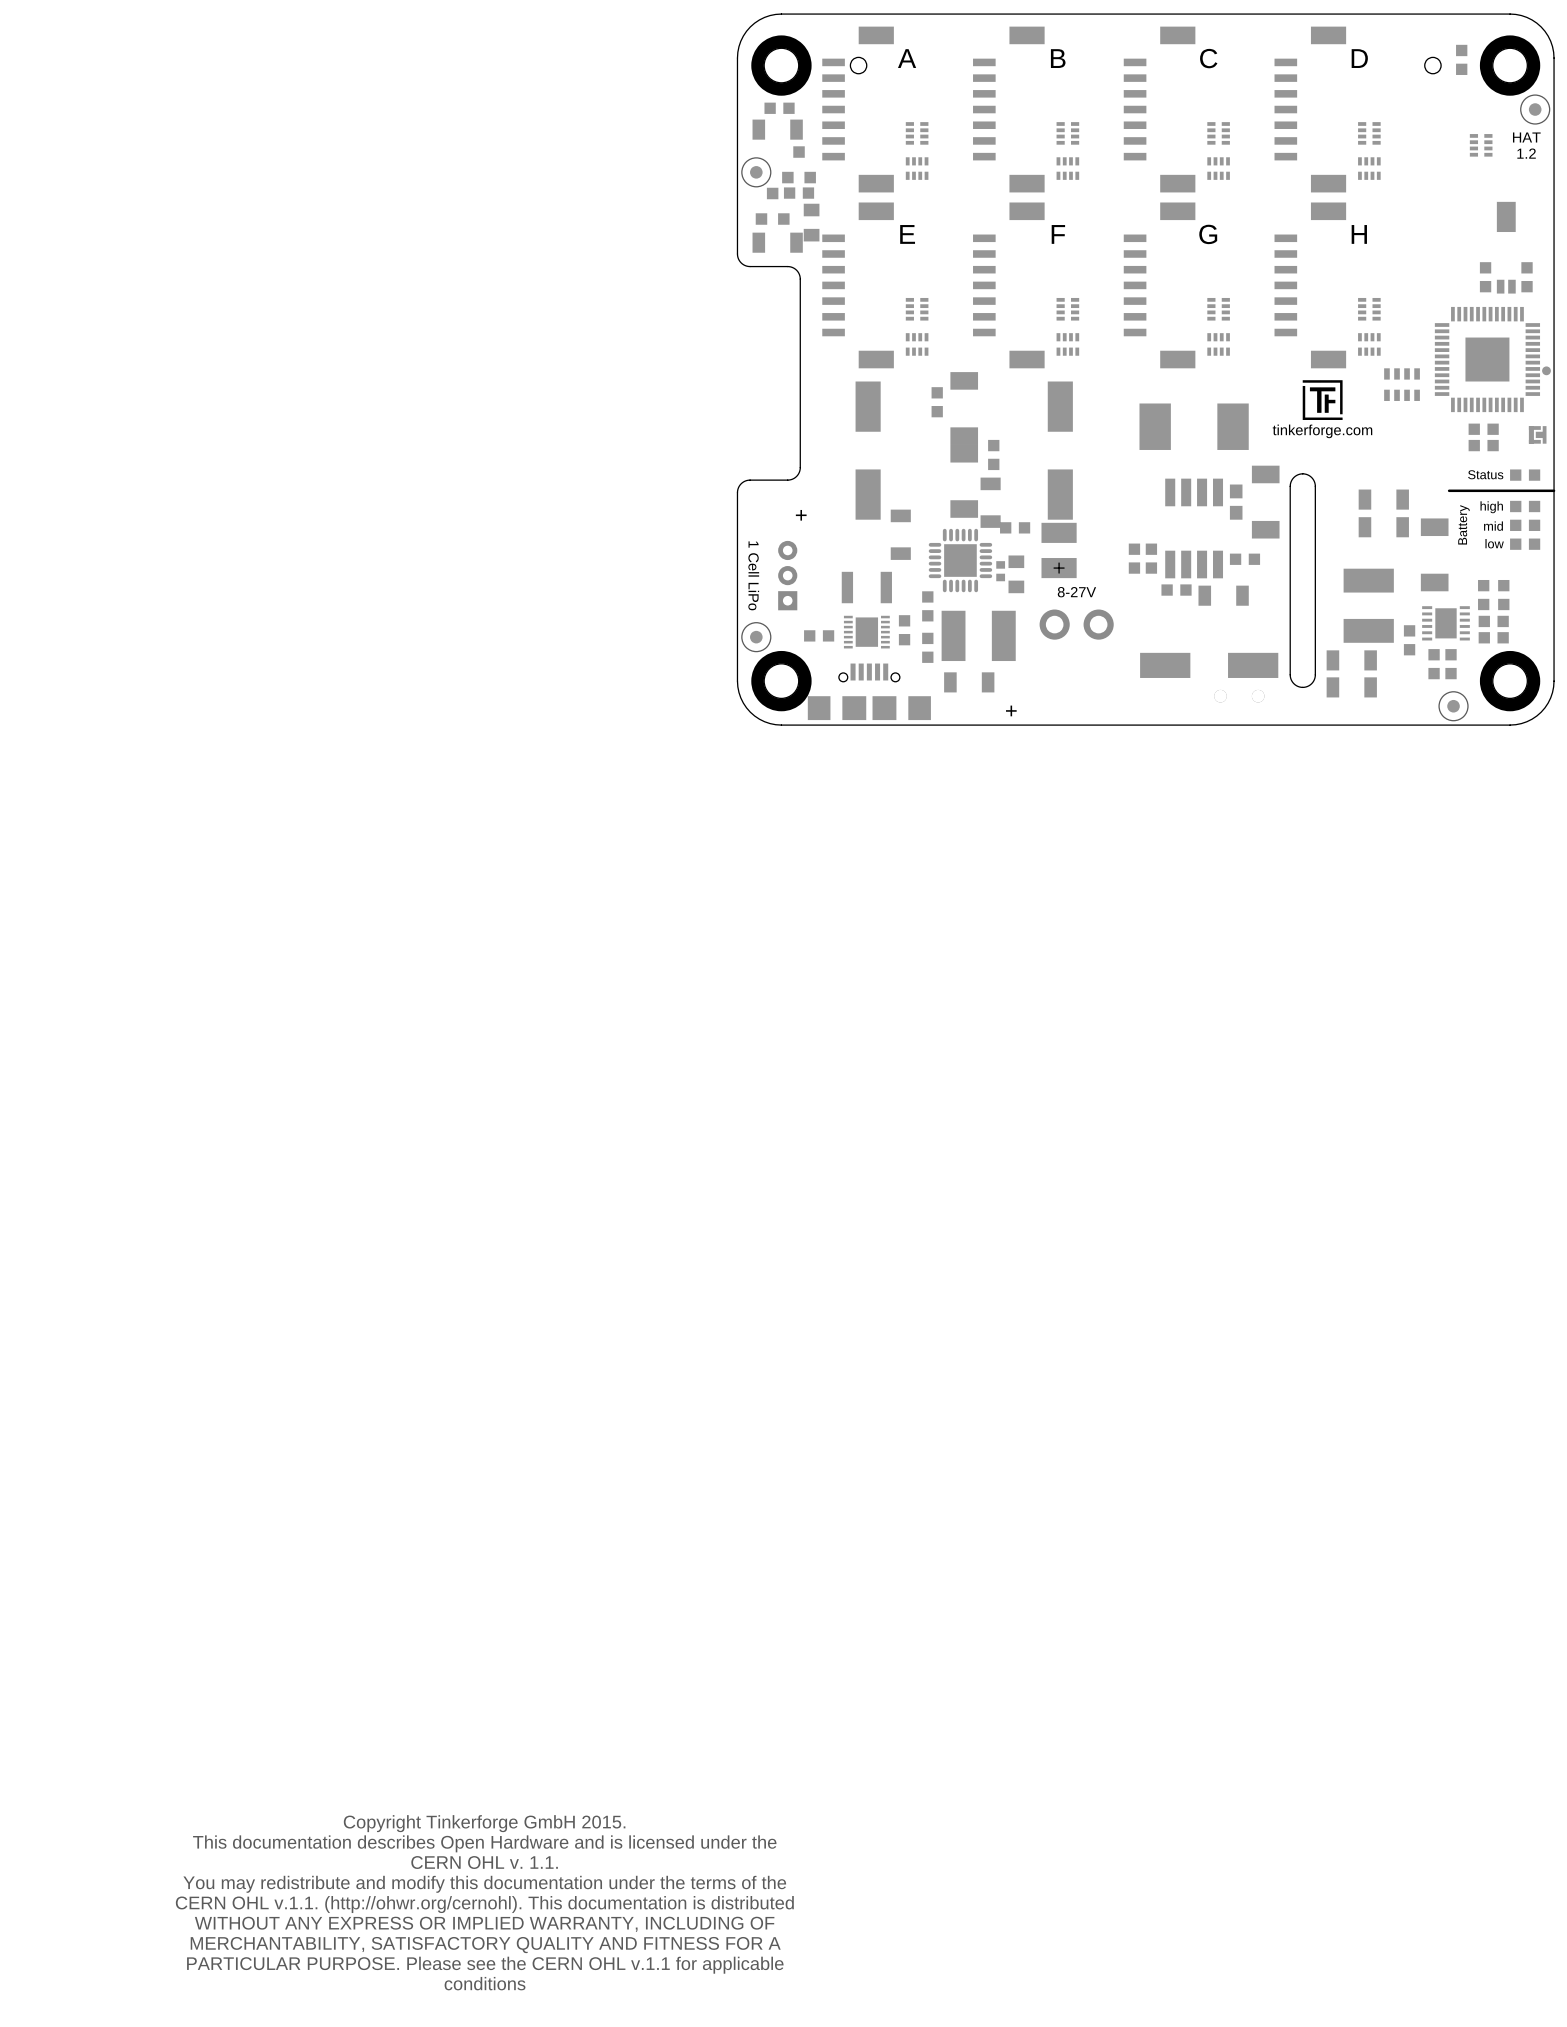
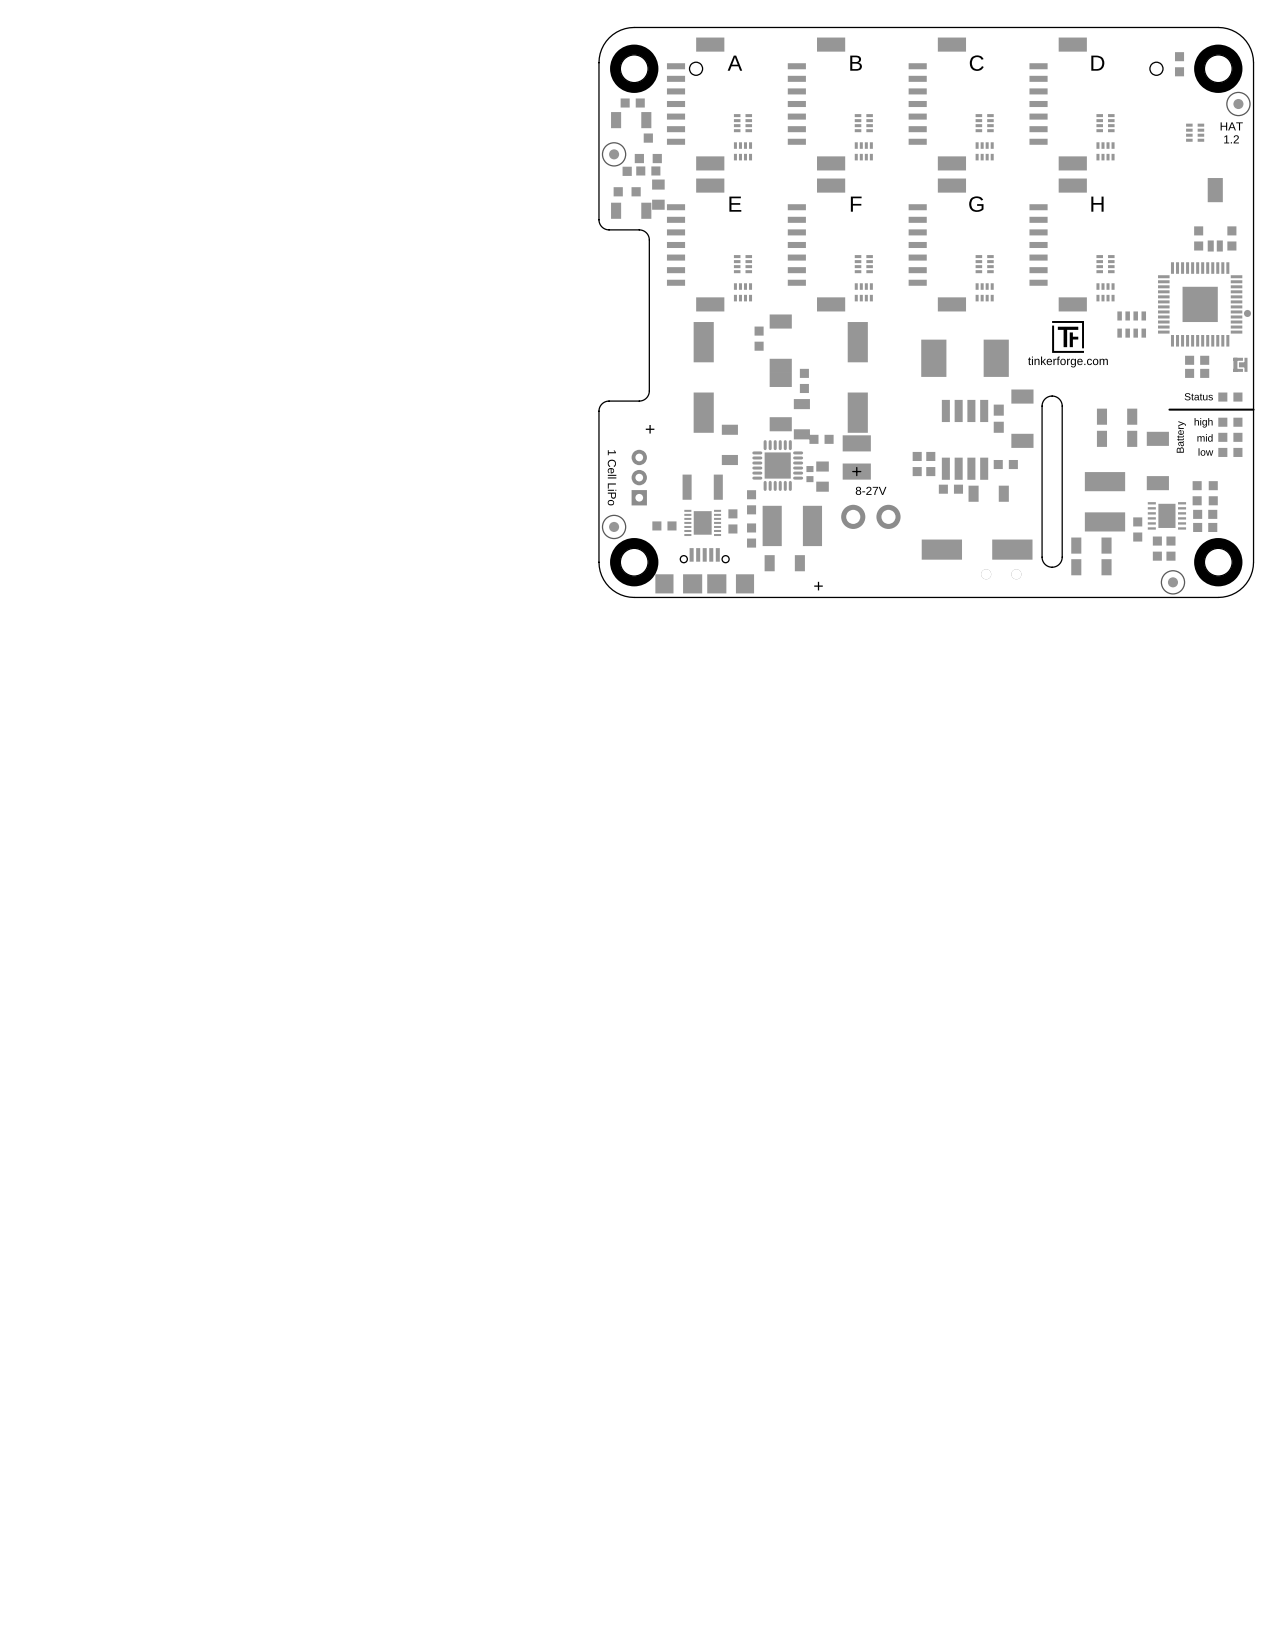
text: Copyright Tinkerforge GmbH 2015. (484, 1823) -> none
text: This documentation describes Open Hardware and is licensed under the (484, 1843) -> none
text: CERN OHL v. 1.1. (484, 1862) -> none
text: You may redistribute and modify this documentation under the terms of the (484, 1884) -> none
text: CERN OHL v.1.1. (http://ohwr.org/cernohl). This documentation is distributed (484, 1904) -> none
text: WITHOUT ANY EXPRESS OR IMPLIED WARRANTY, INCLUDING OF (484, 1924) -> none
text: MERCHANTABILITY, SATISFACTORY QUALITY AND FITNESS FOR A (485, 1945) -> none
text: PARTICULAR PURPOSE. Please see the CERN OHL v.1.1 for applicable (485, 1965) -> none
text: conditions (485, 1983) -> none

